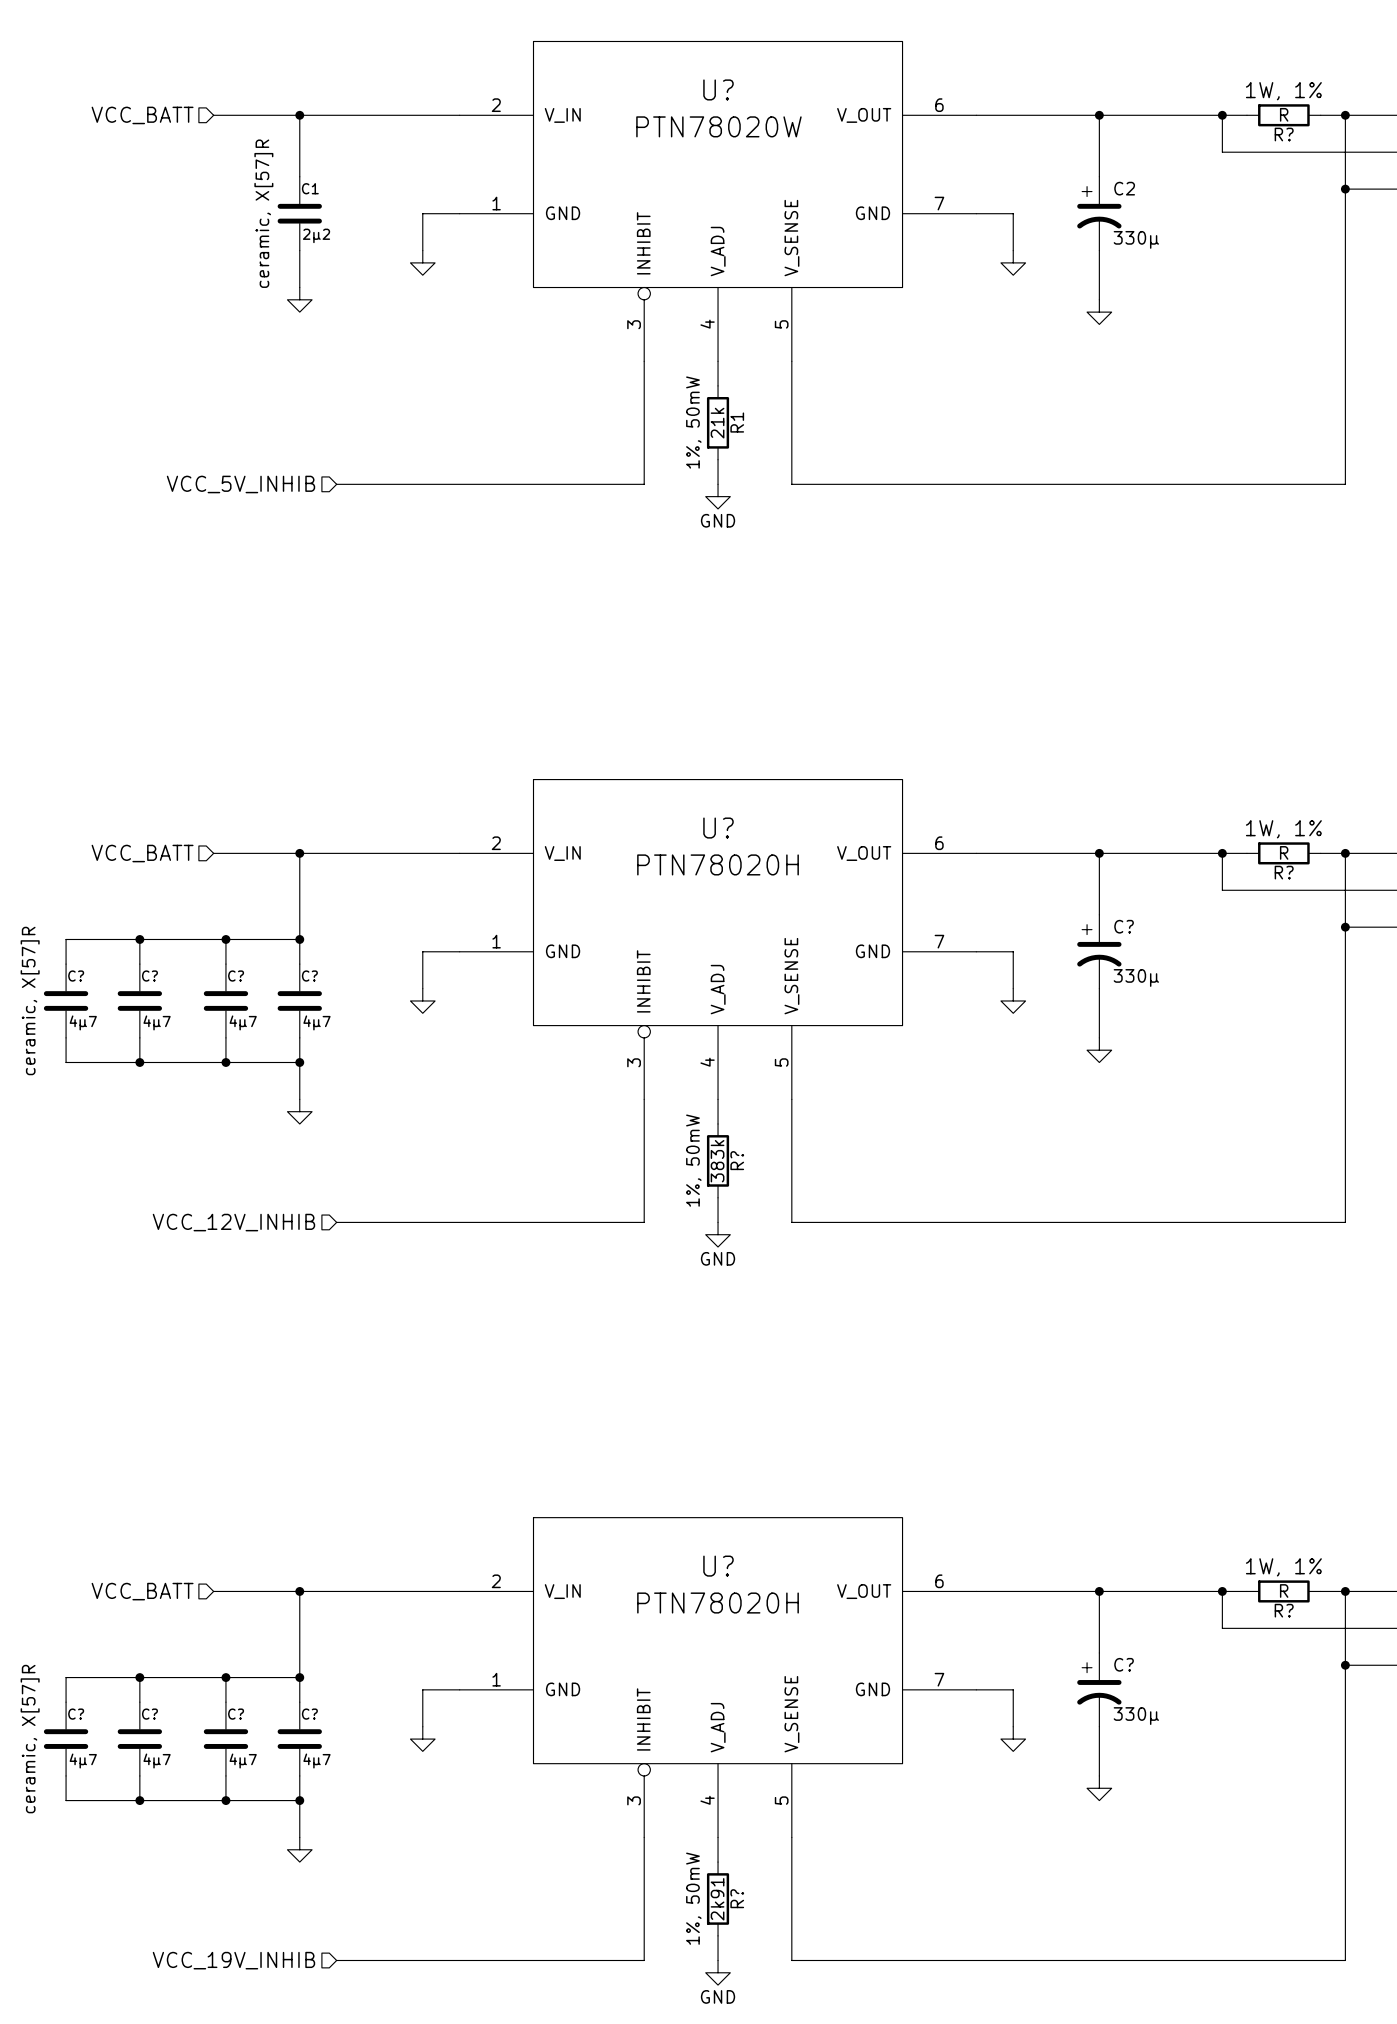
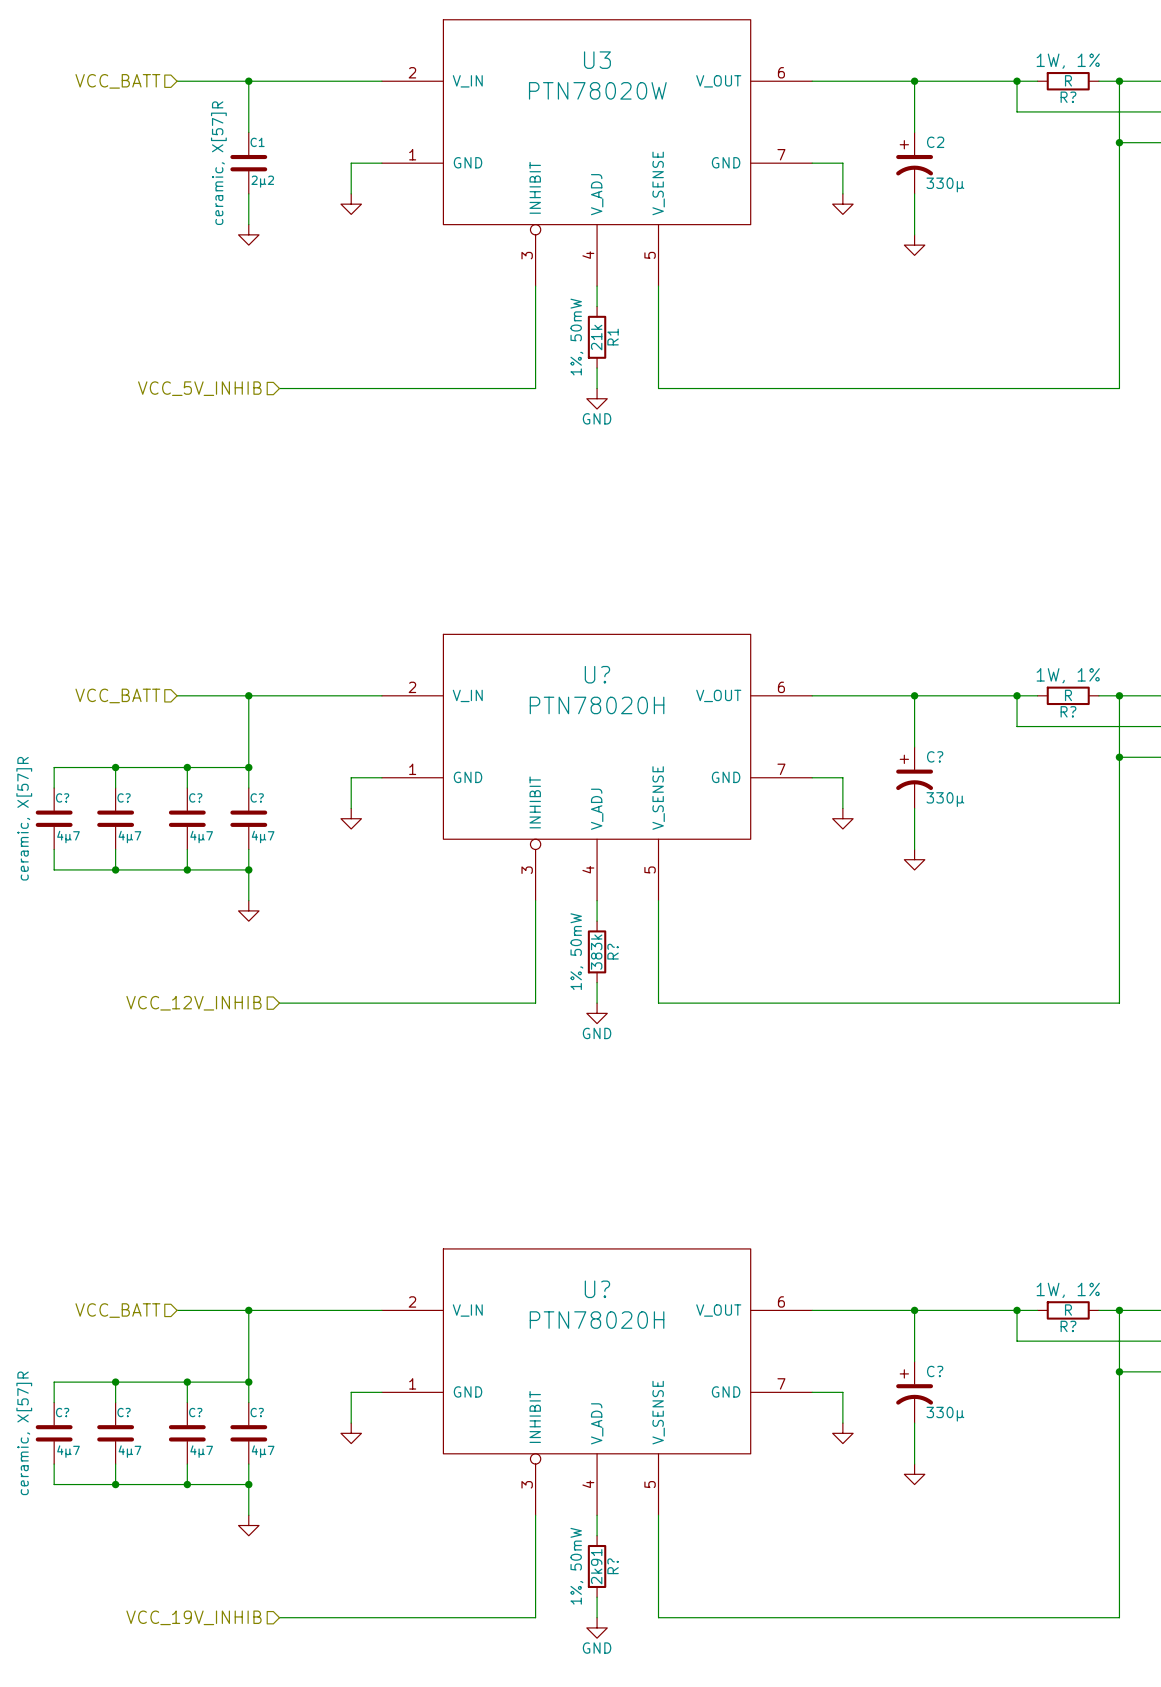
U? name: U? (718, 89) -> U3 (597, 60)

